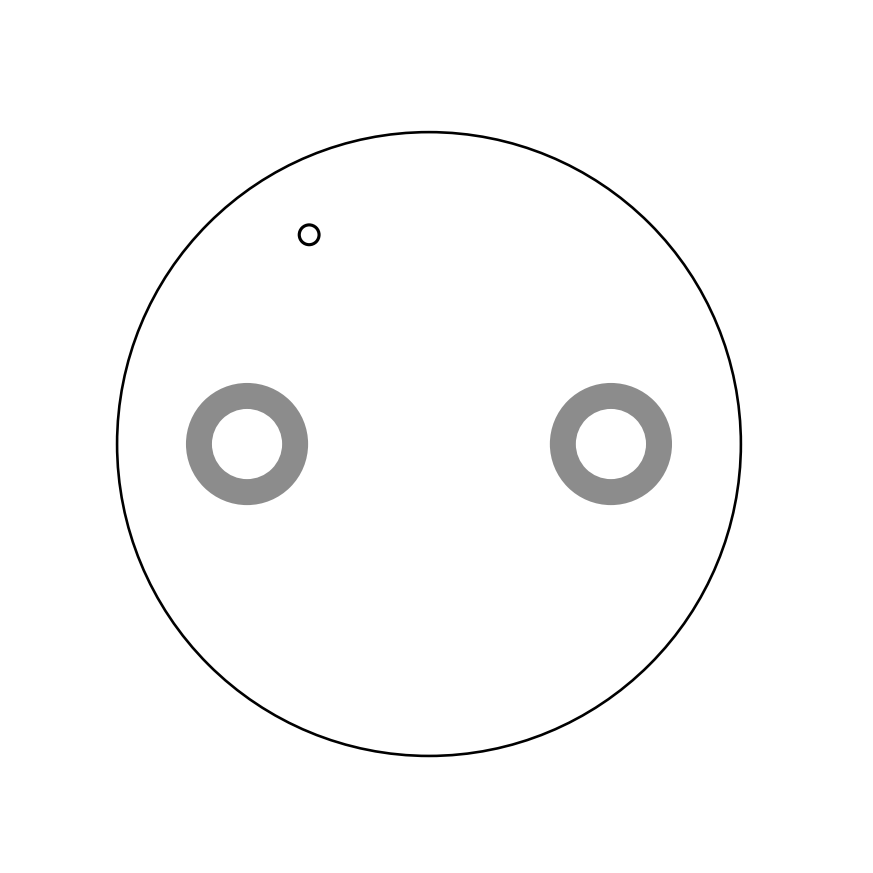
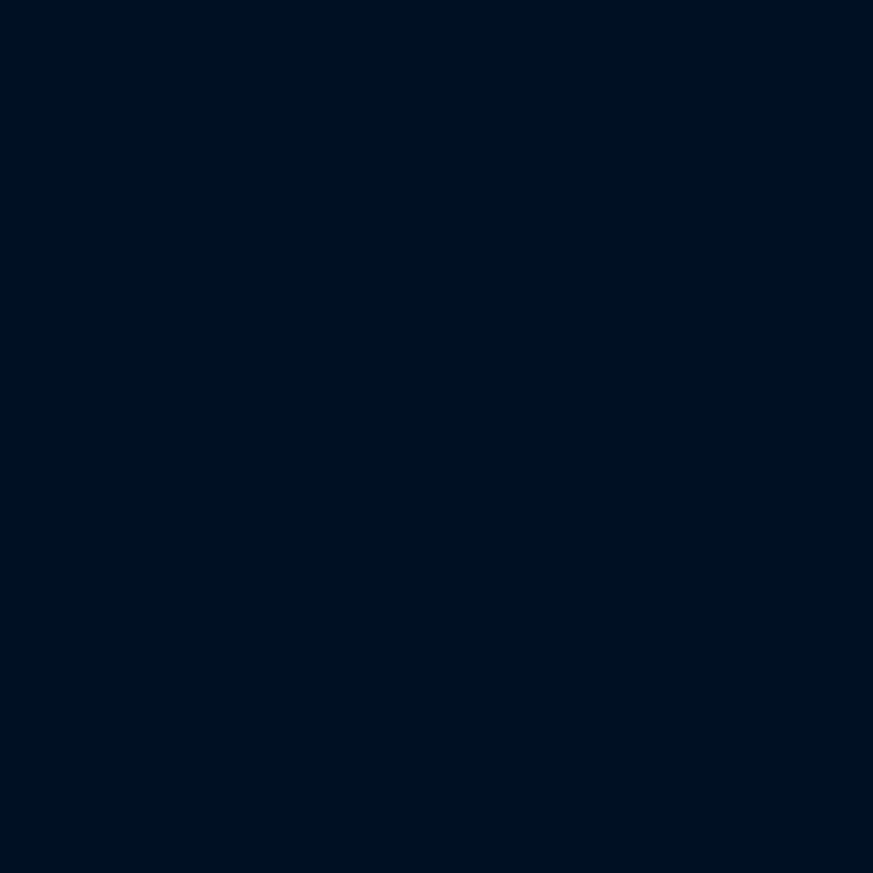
round board edge: [115, 130, 743, 758] -> none
part: (309, 234) -> none
part: (247, 444) -> none
part: (610, 444) -> none

